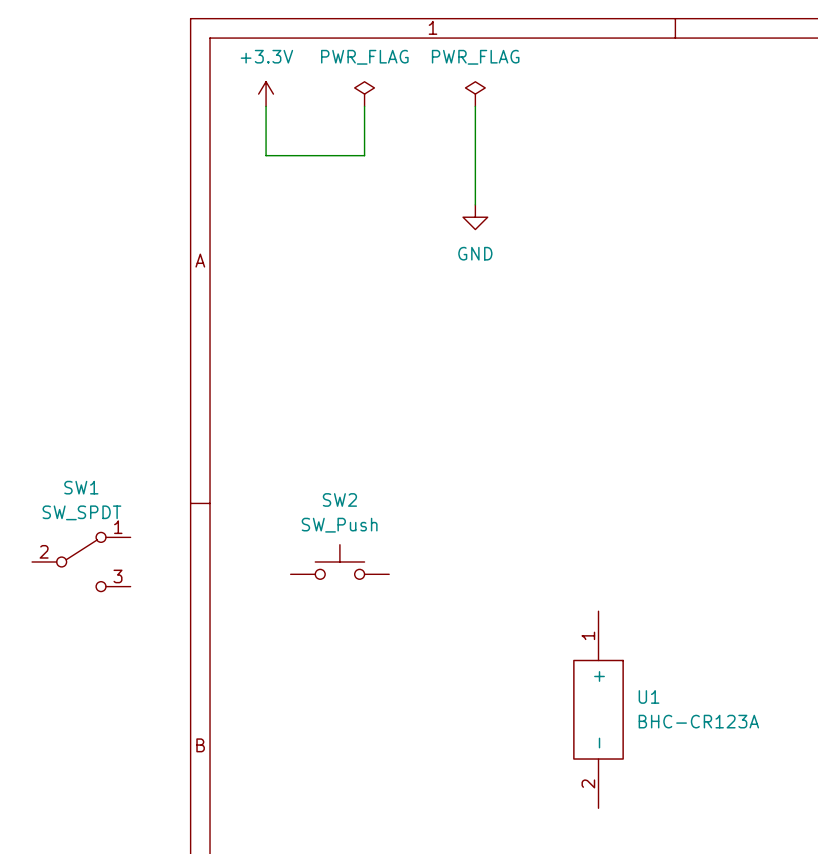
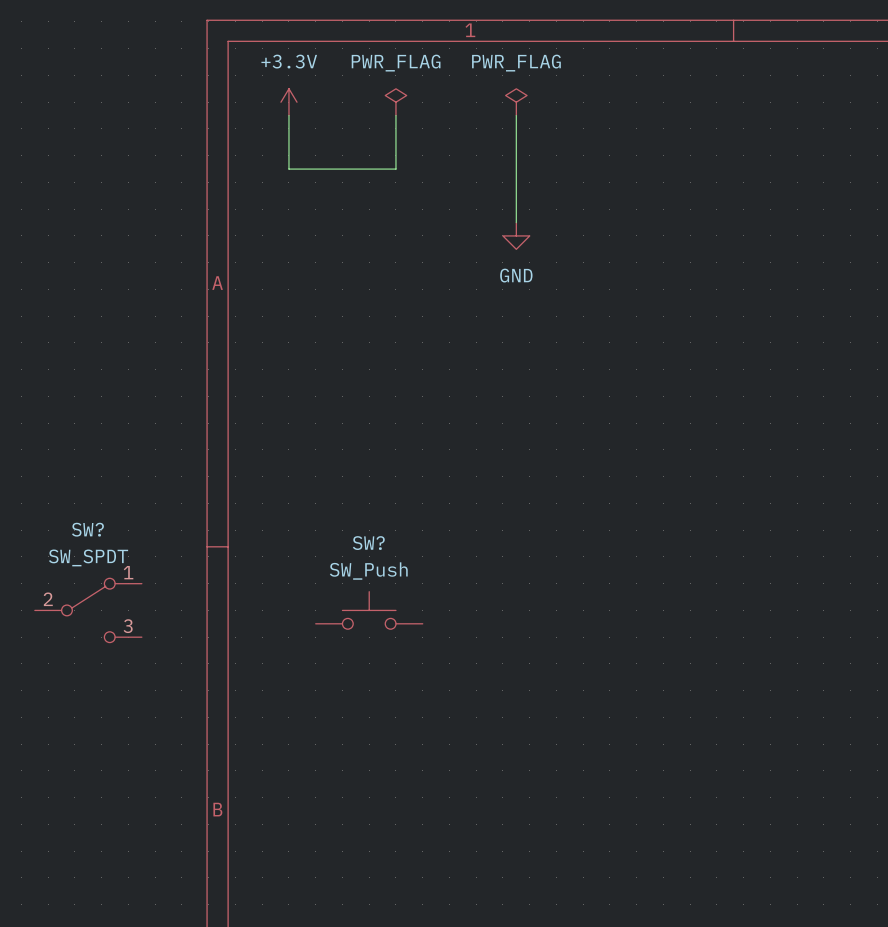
SW1 name: SW1 (81, 487) -> SW? (87, 529)
SW2 name: SW2 (339, 499) -> SW? (368, 543)
U1: BHC-CR123A (598, 709) -> none

